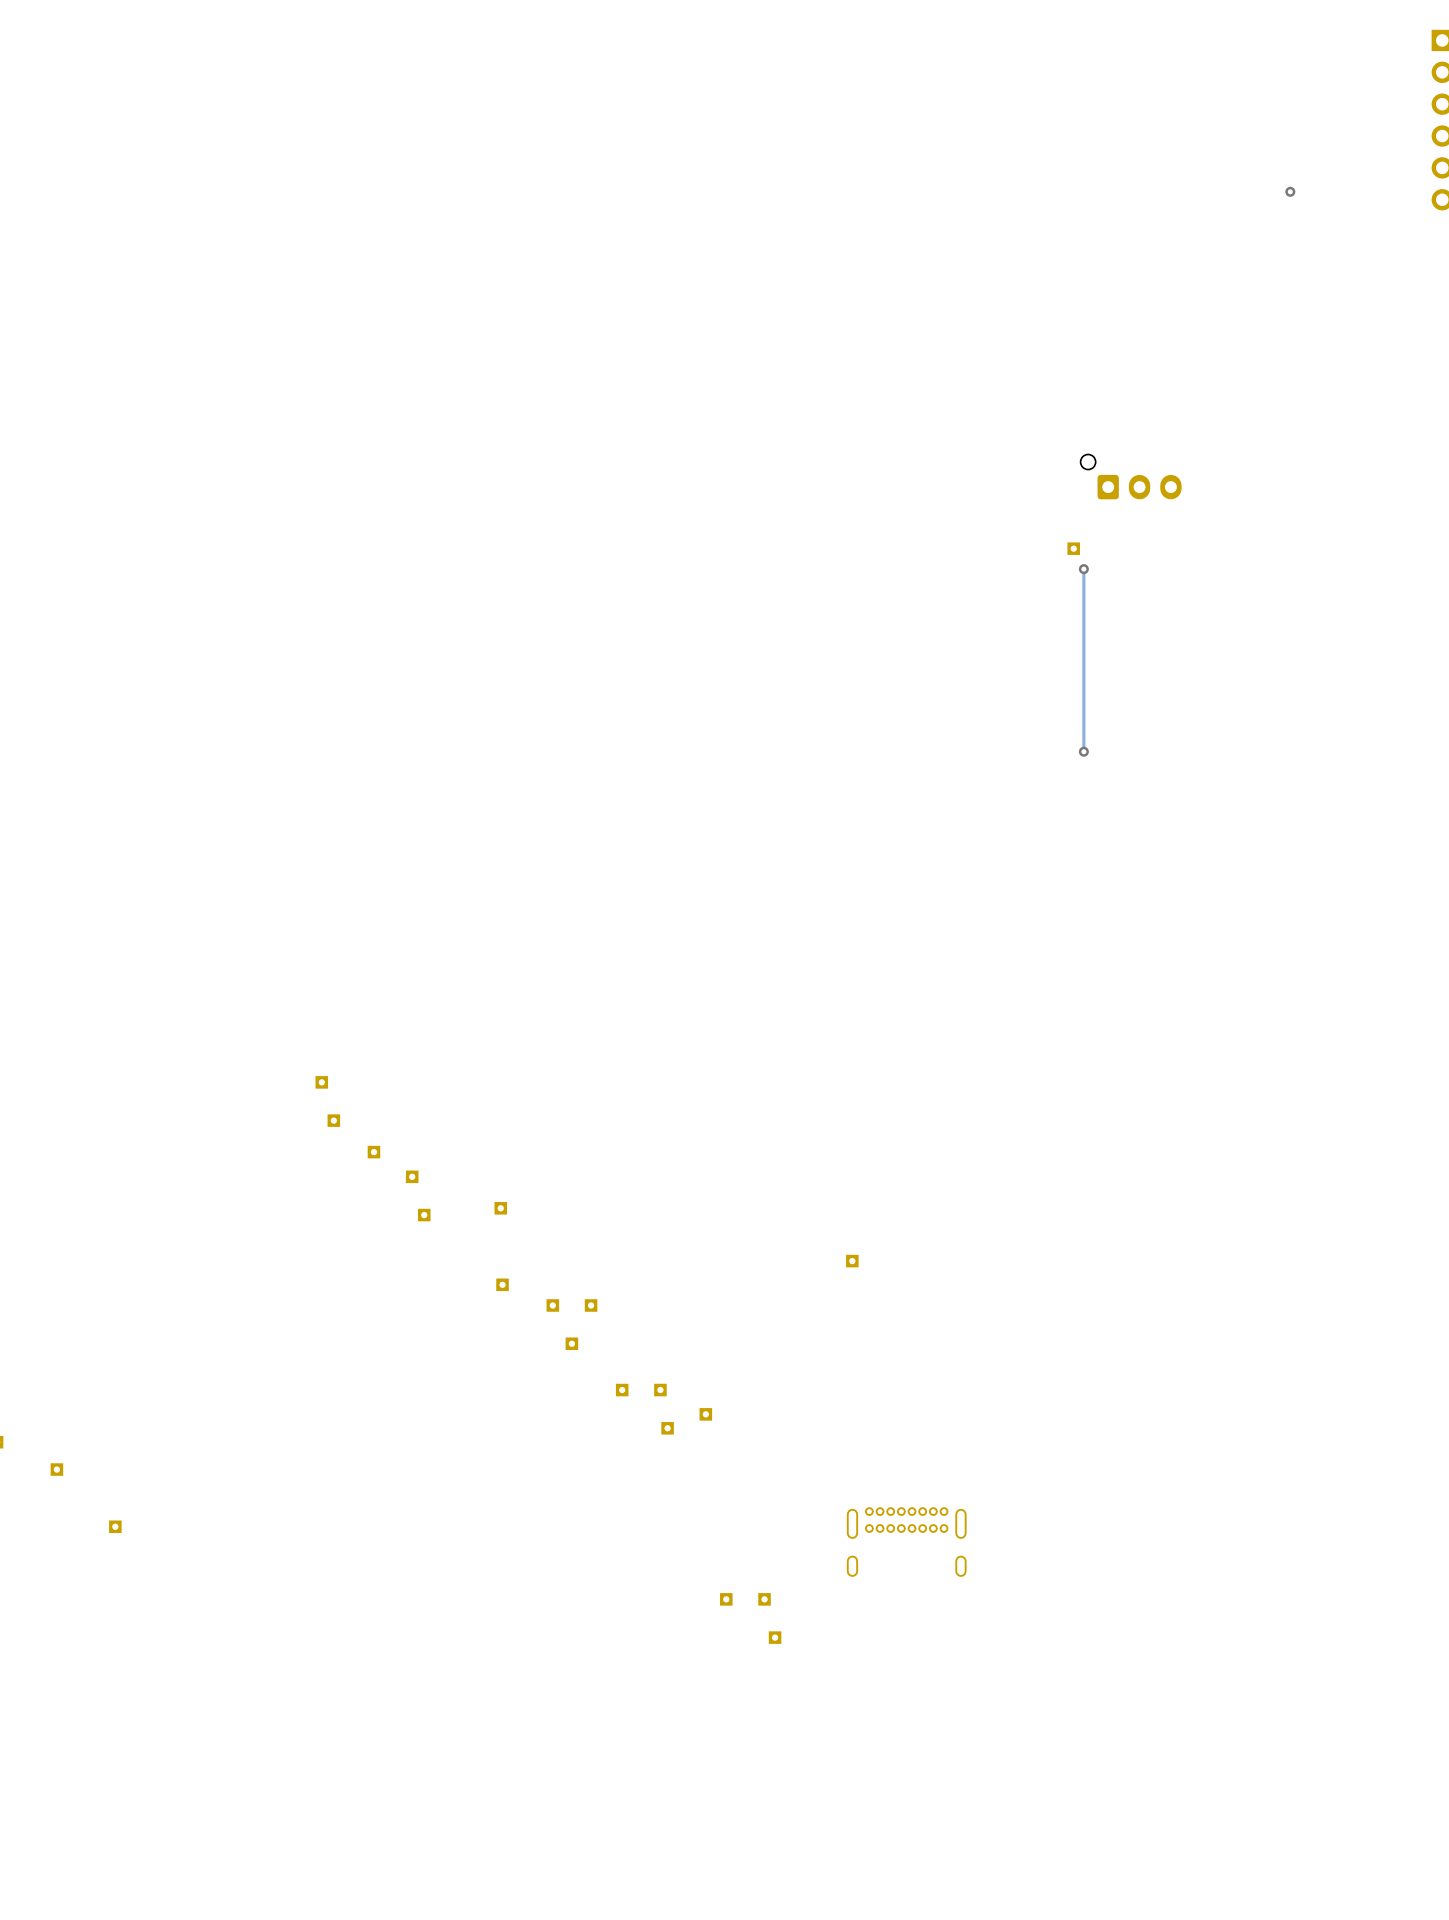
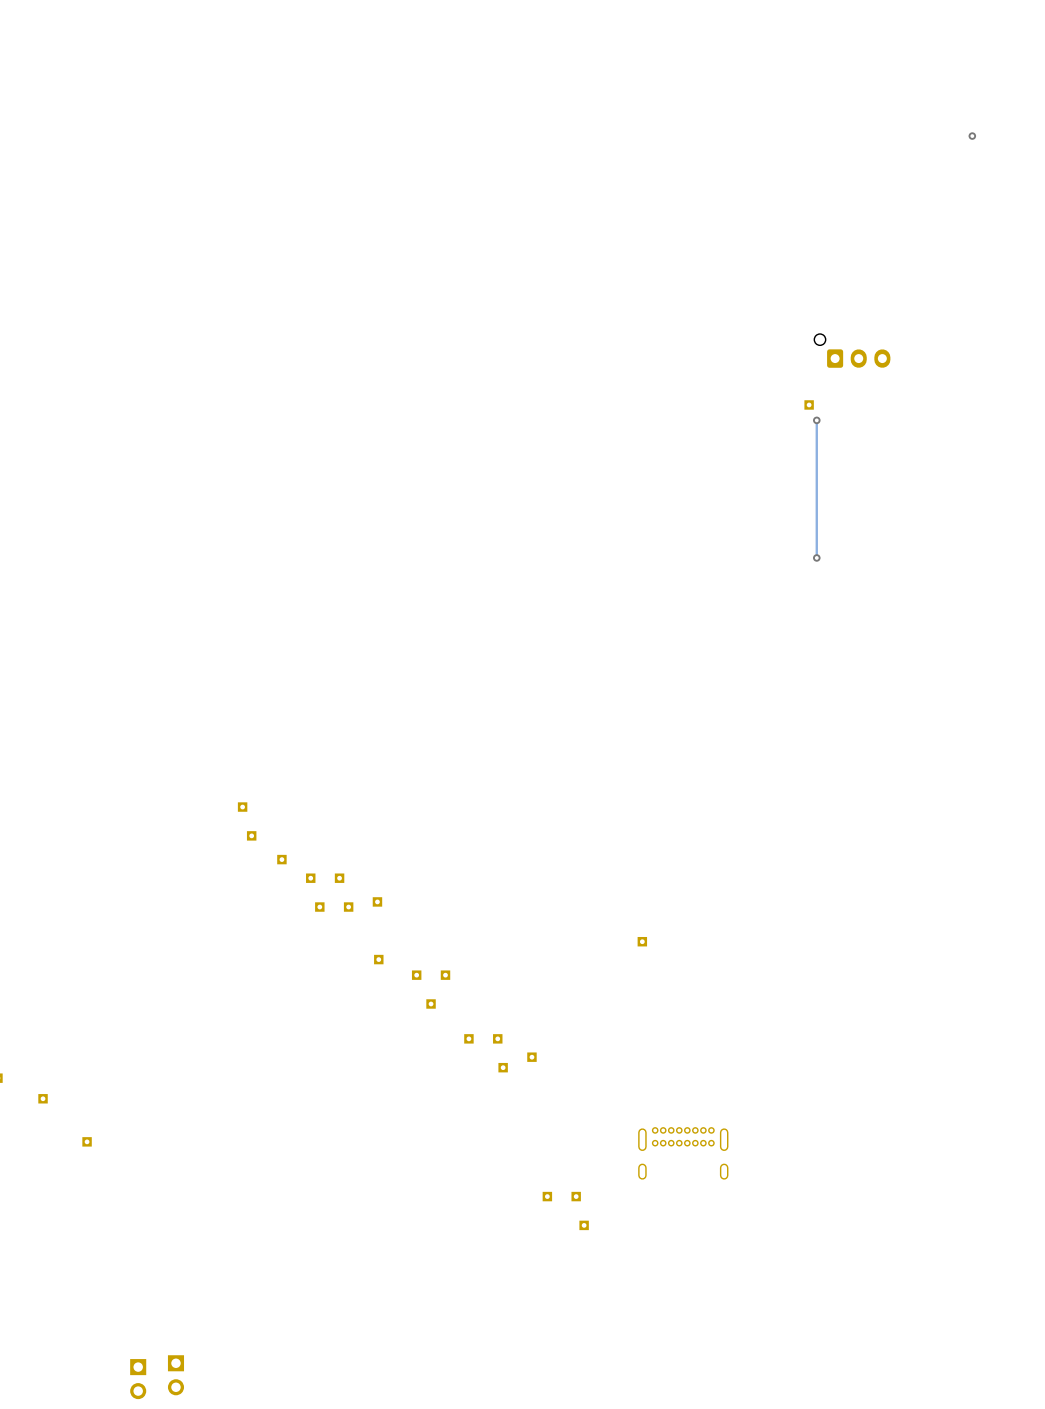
part: none -> (339, 878)
part: none -> (348, 907)
part: none -> (175, 1375)
part: none -> (138, 1379)

